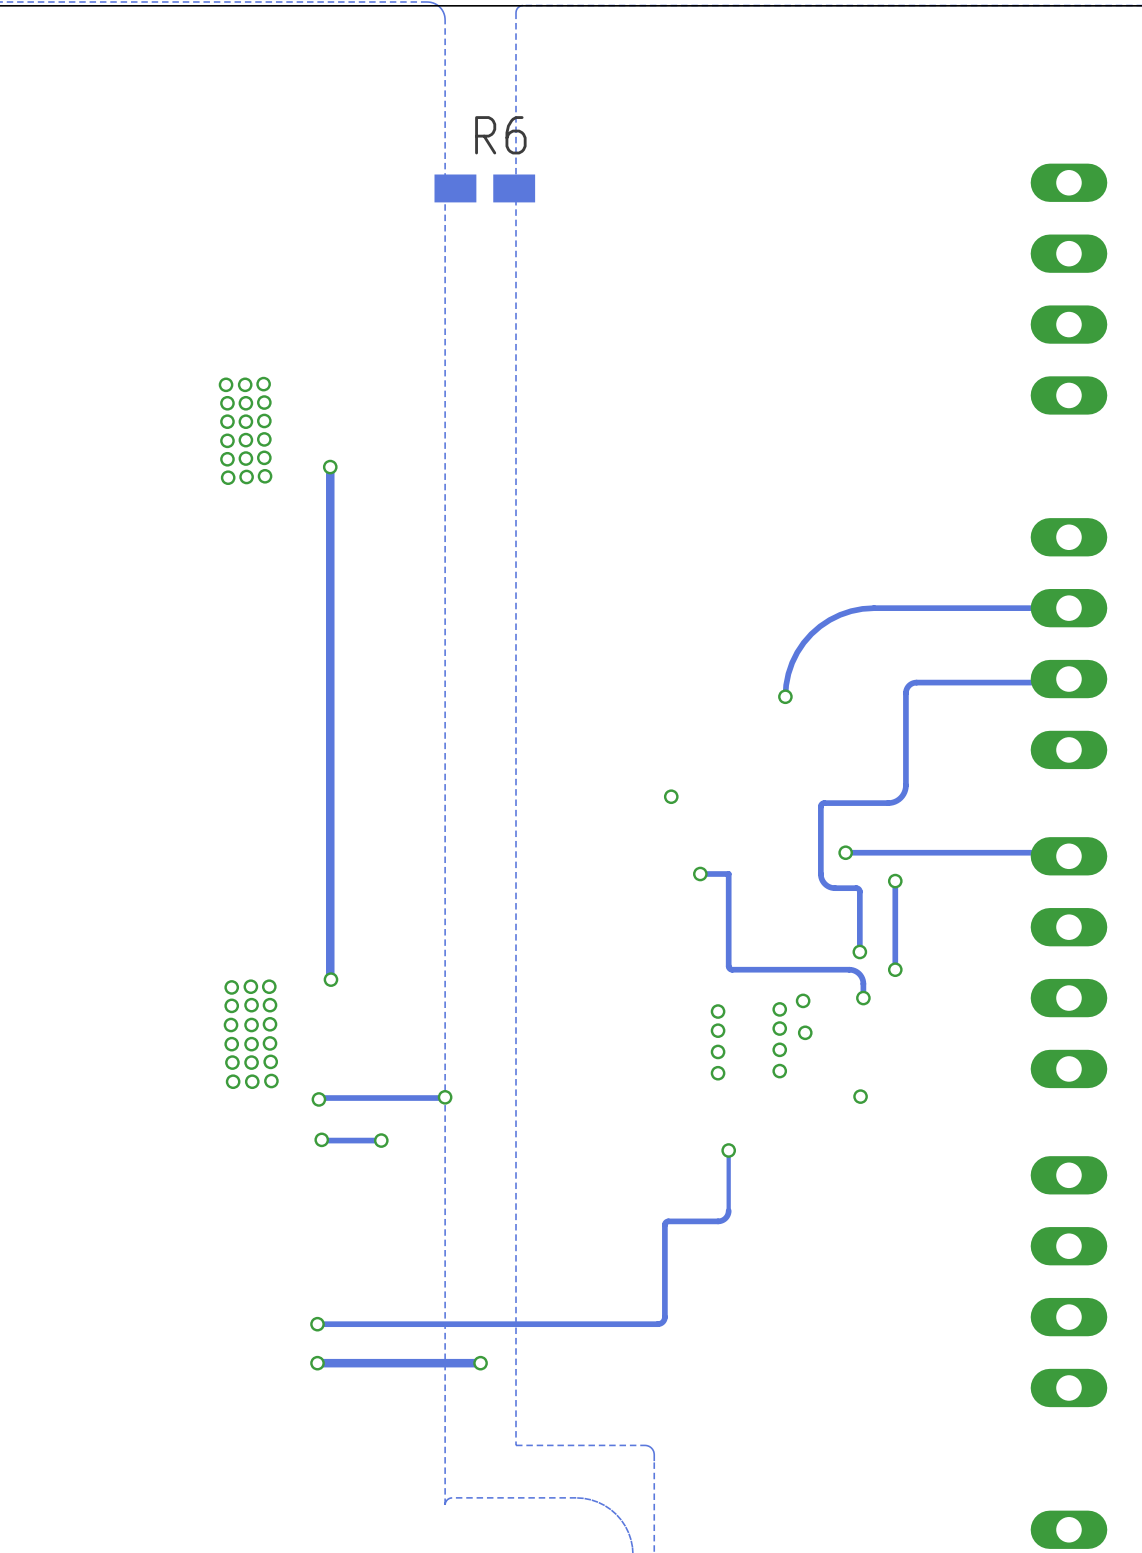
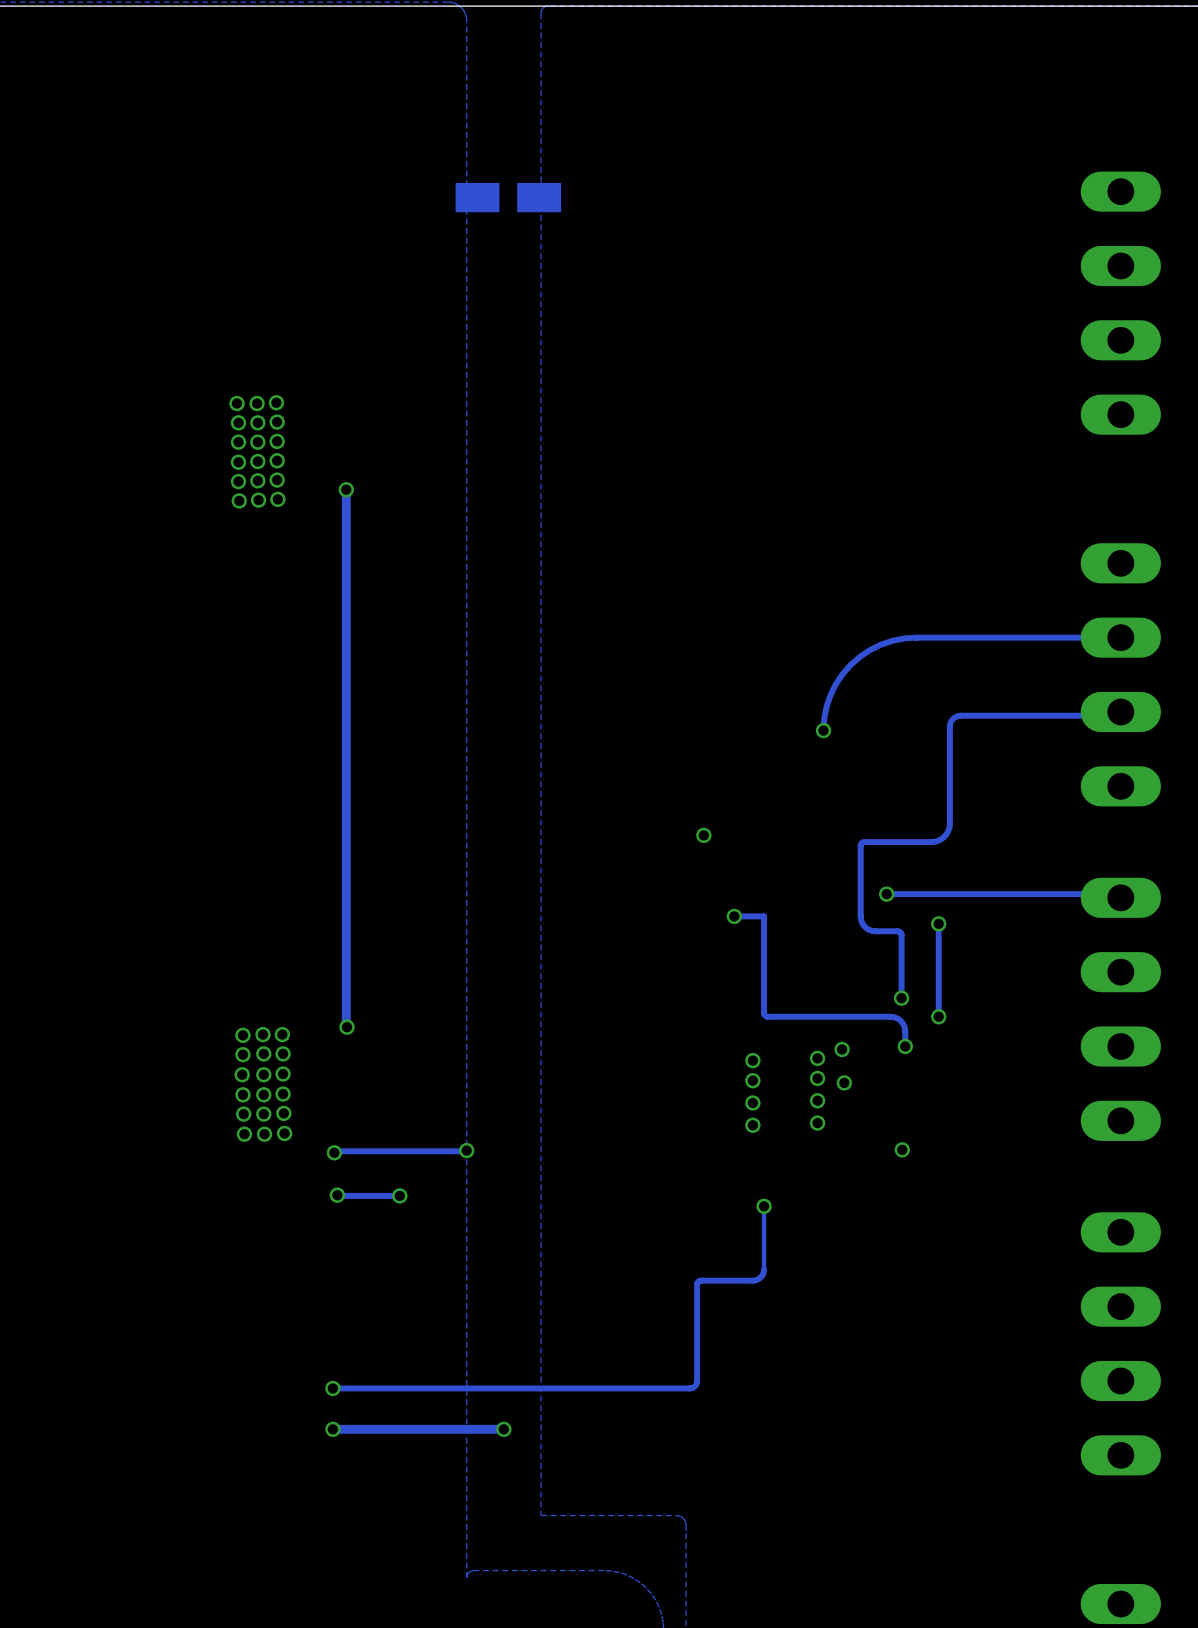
R6 name: R6 (500, 135) -> none

